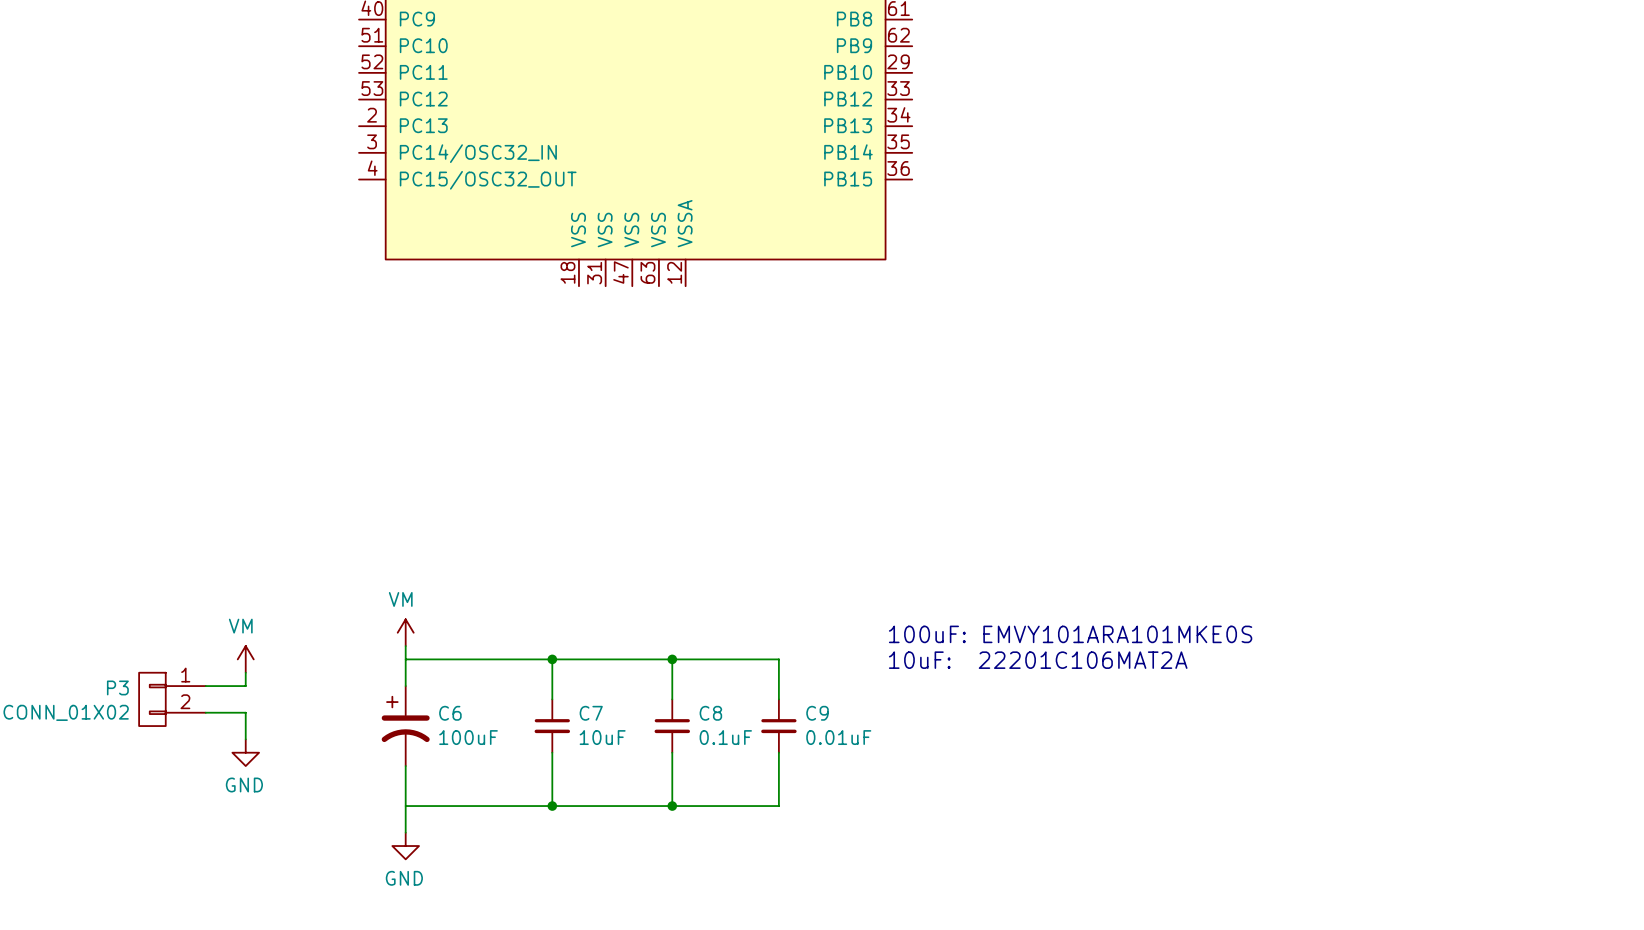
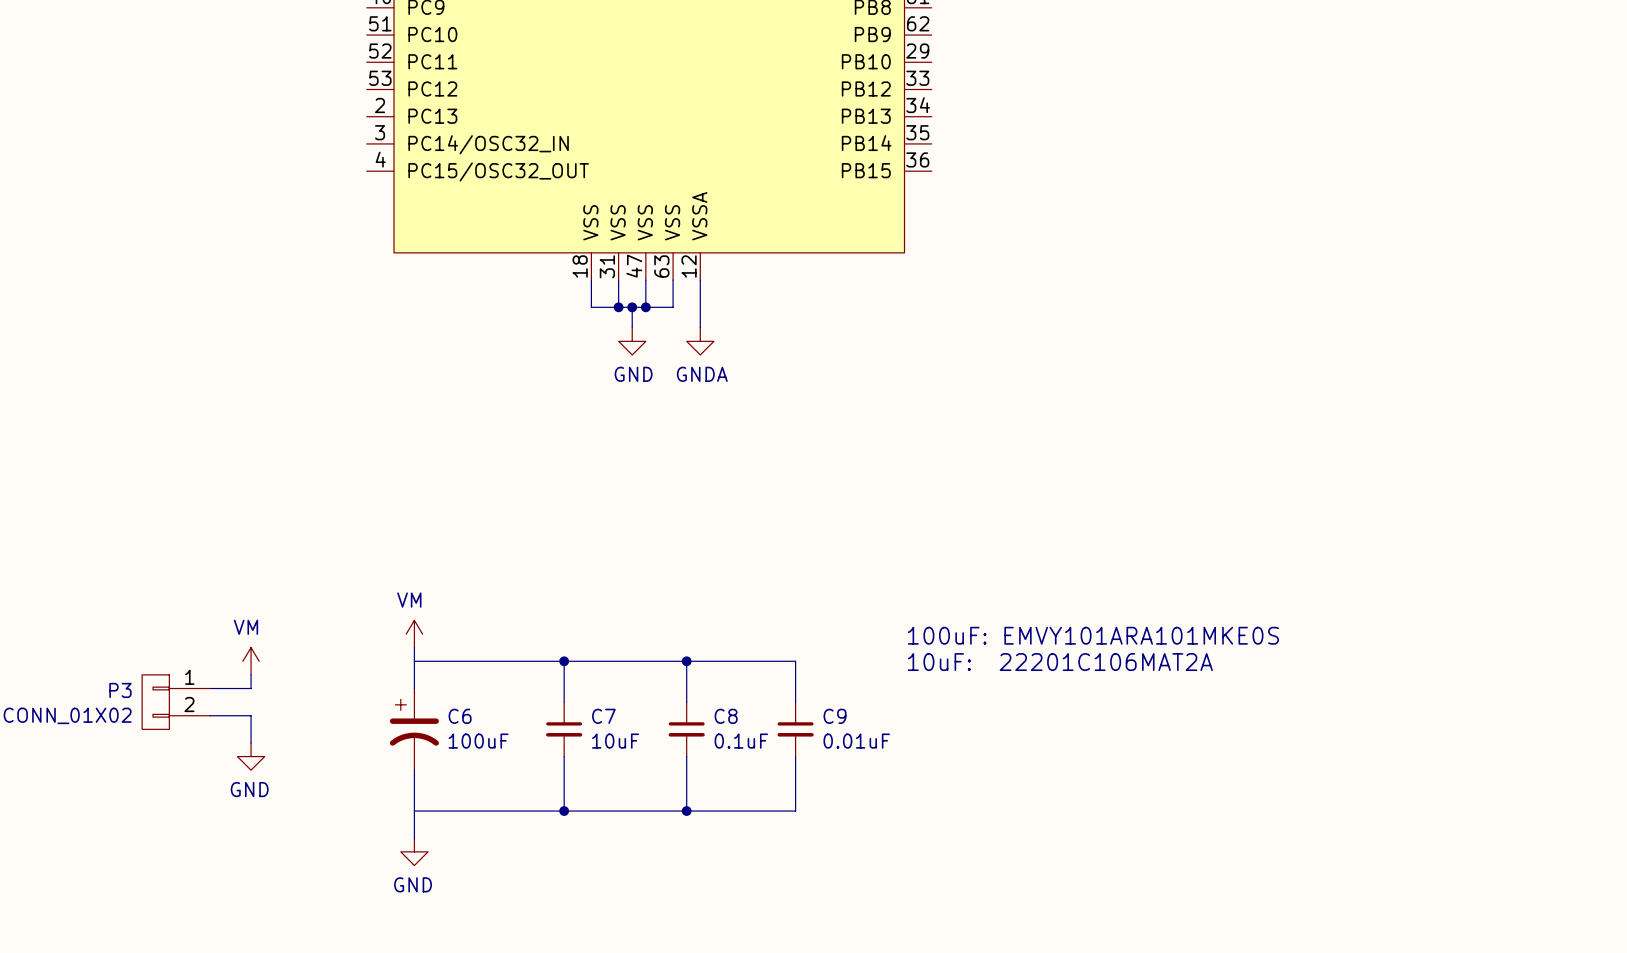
wire: none -> (591, 280) (591, 307) (673, 307) (673, 280)
wire: none -> (618, 280) (618, 307)
wire: none -> (645, 280) (645, 307)
wire: none -> (700, 280) (700, 327)
junction: none -> (618, 307)
wire: none -> (632, 307) (632, 327)
junction: none -> (632, 307)
junction: none -> (645, 307)
power symbol: none -> GND (632, 341)
power symbol: none -> GNDA (700, 341)

